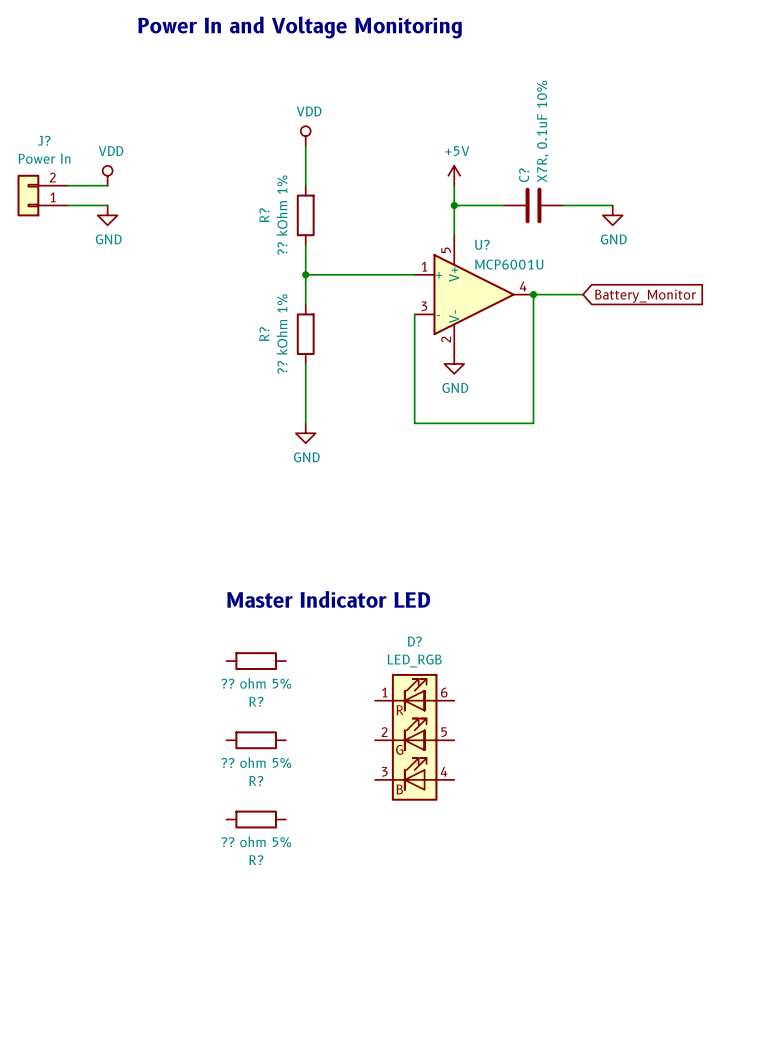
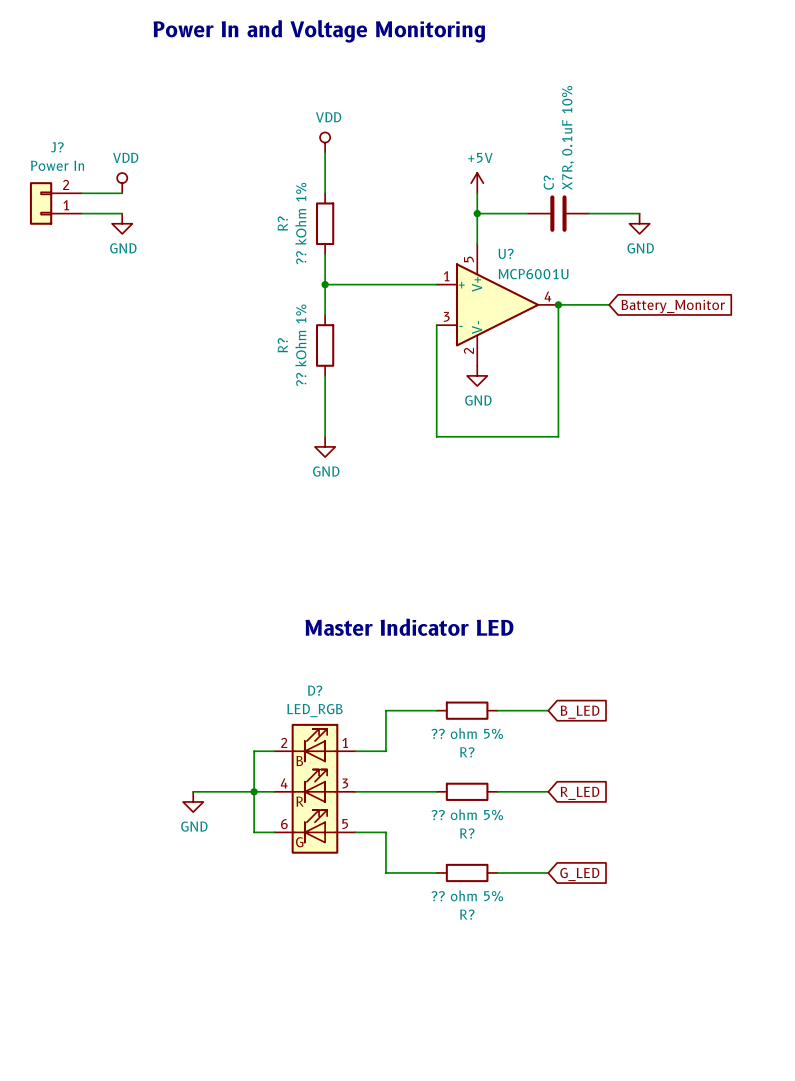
text position: Master Indicator LED (328, 599) -> Master Indicator LED (409, 627)
R?: ?? ohm 5% (256, 661) -> none
wire: none -> (436, 710) (385, 710) (385, 751) (355, 751)
R?: none -> ?? ohm 5% (467, 710)
wire: none -> (497, 710) (548, 710)
global label: none -> B_LED (580, 712)
wire: none -> (274, 751) (254, 751) (254, 832) (274, 832)
D?: LED_RGB (414, 737) -> none
R?: ?? ohm 5% (256, 740) -> none
D?: none -> LED_RGB (314, 788)
wire: none -> (193, 791) (274, 791)
junction: none -> (254, 791)
wire: none -> (355, 791) (436, 791)
R?: none -> ?? ohm 5% (467, 791)
wire: none -> (497, 791) (548, 791)
global label: none -> R_LED (580, 793)
power symbol: none -> GND (193, 801)
wire: none -> (355, 832) (385, 832) (385, 872) (436, 872)
R?: ?? ohm 5% (256, 819) -> none
R?: none -> ?? ohm 5% (467, 872)
wire: none -> (497, 872) (548, 872)
global label: none -> G_LED (579, 874)

